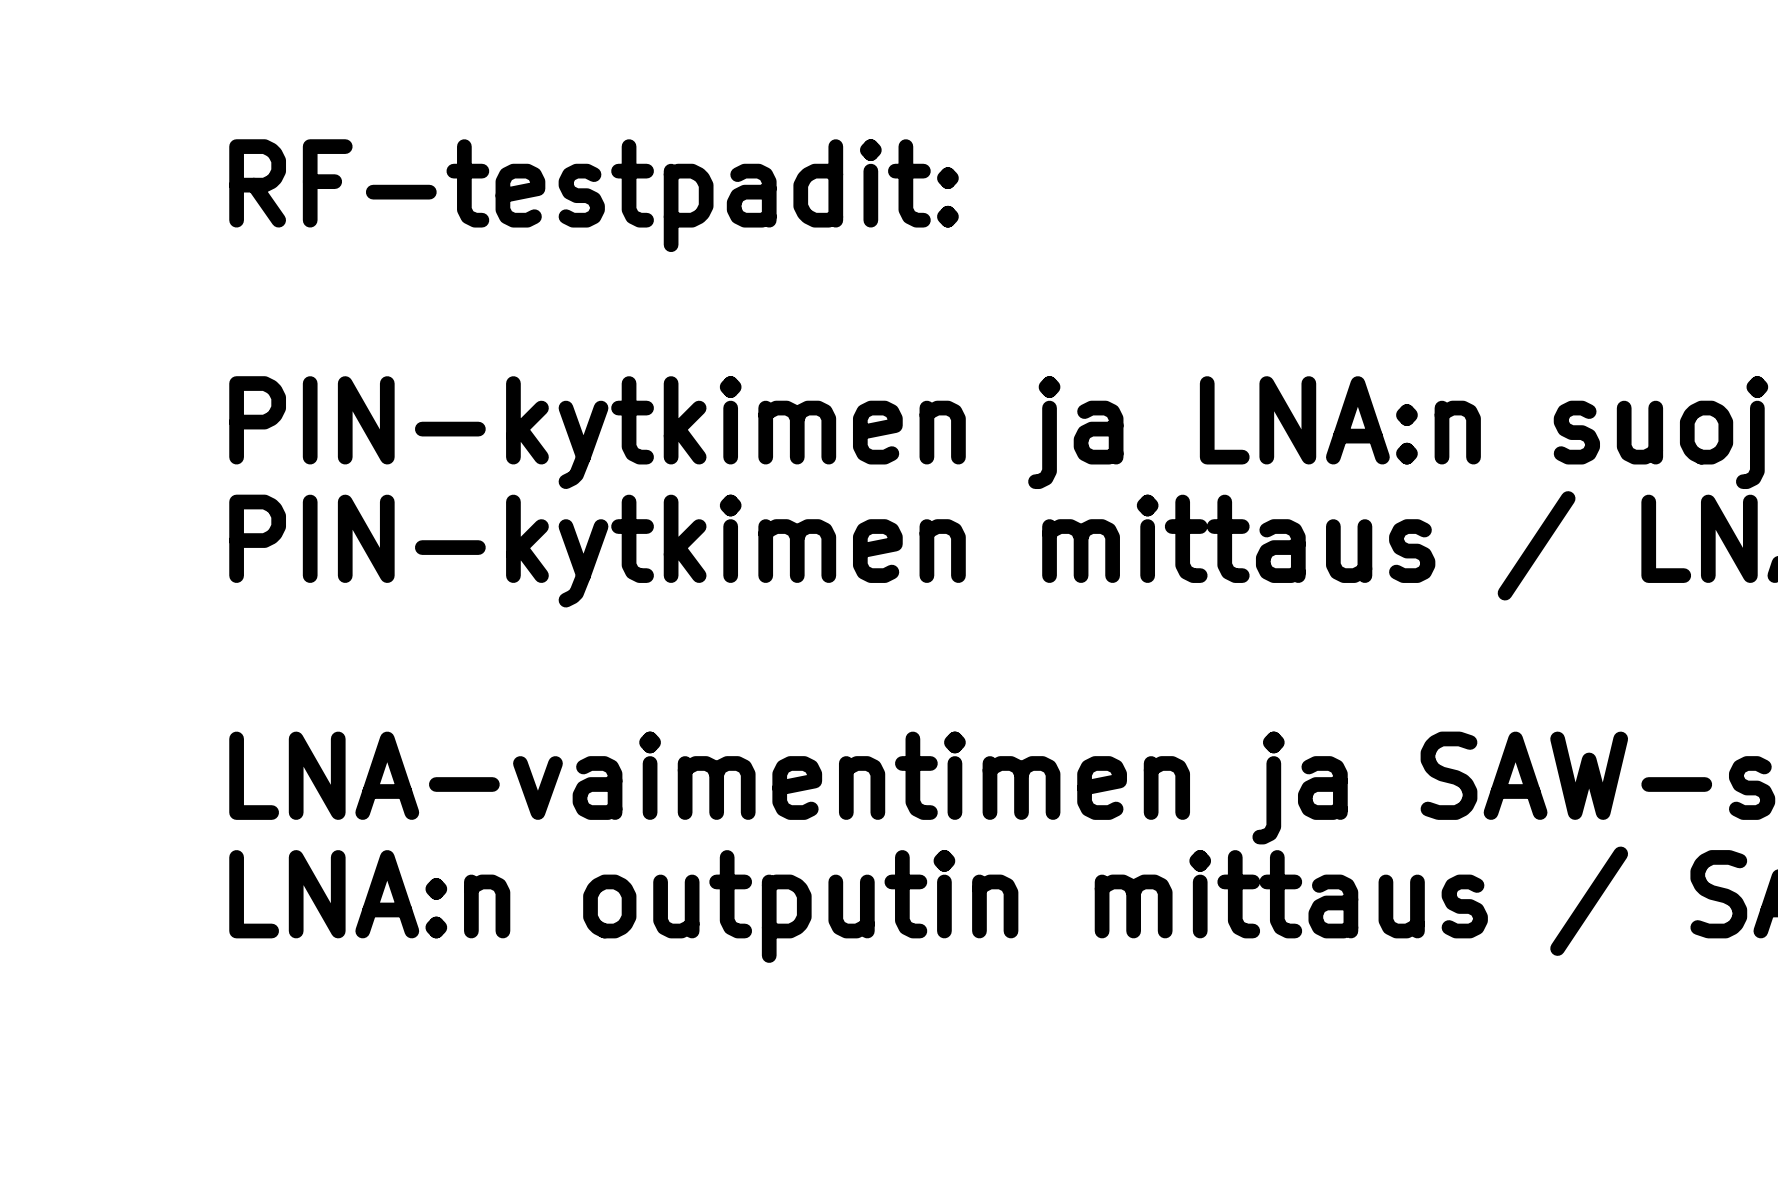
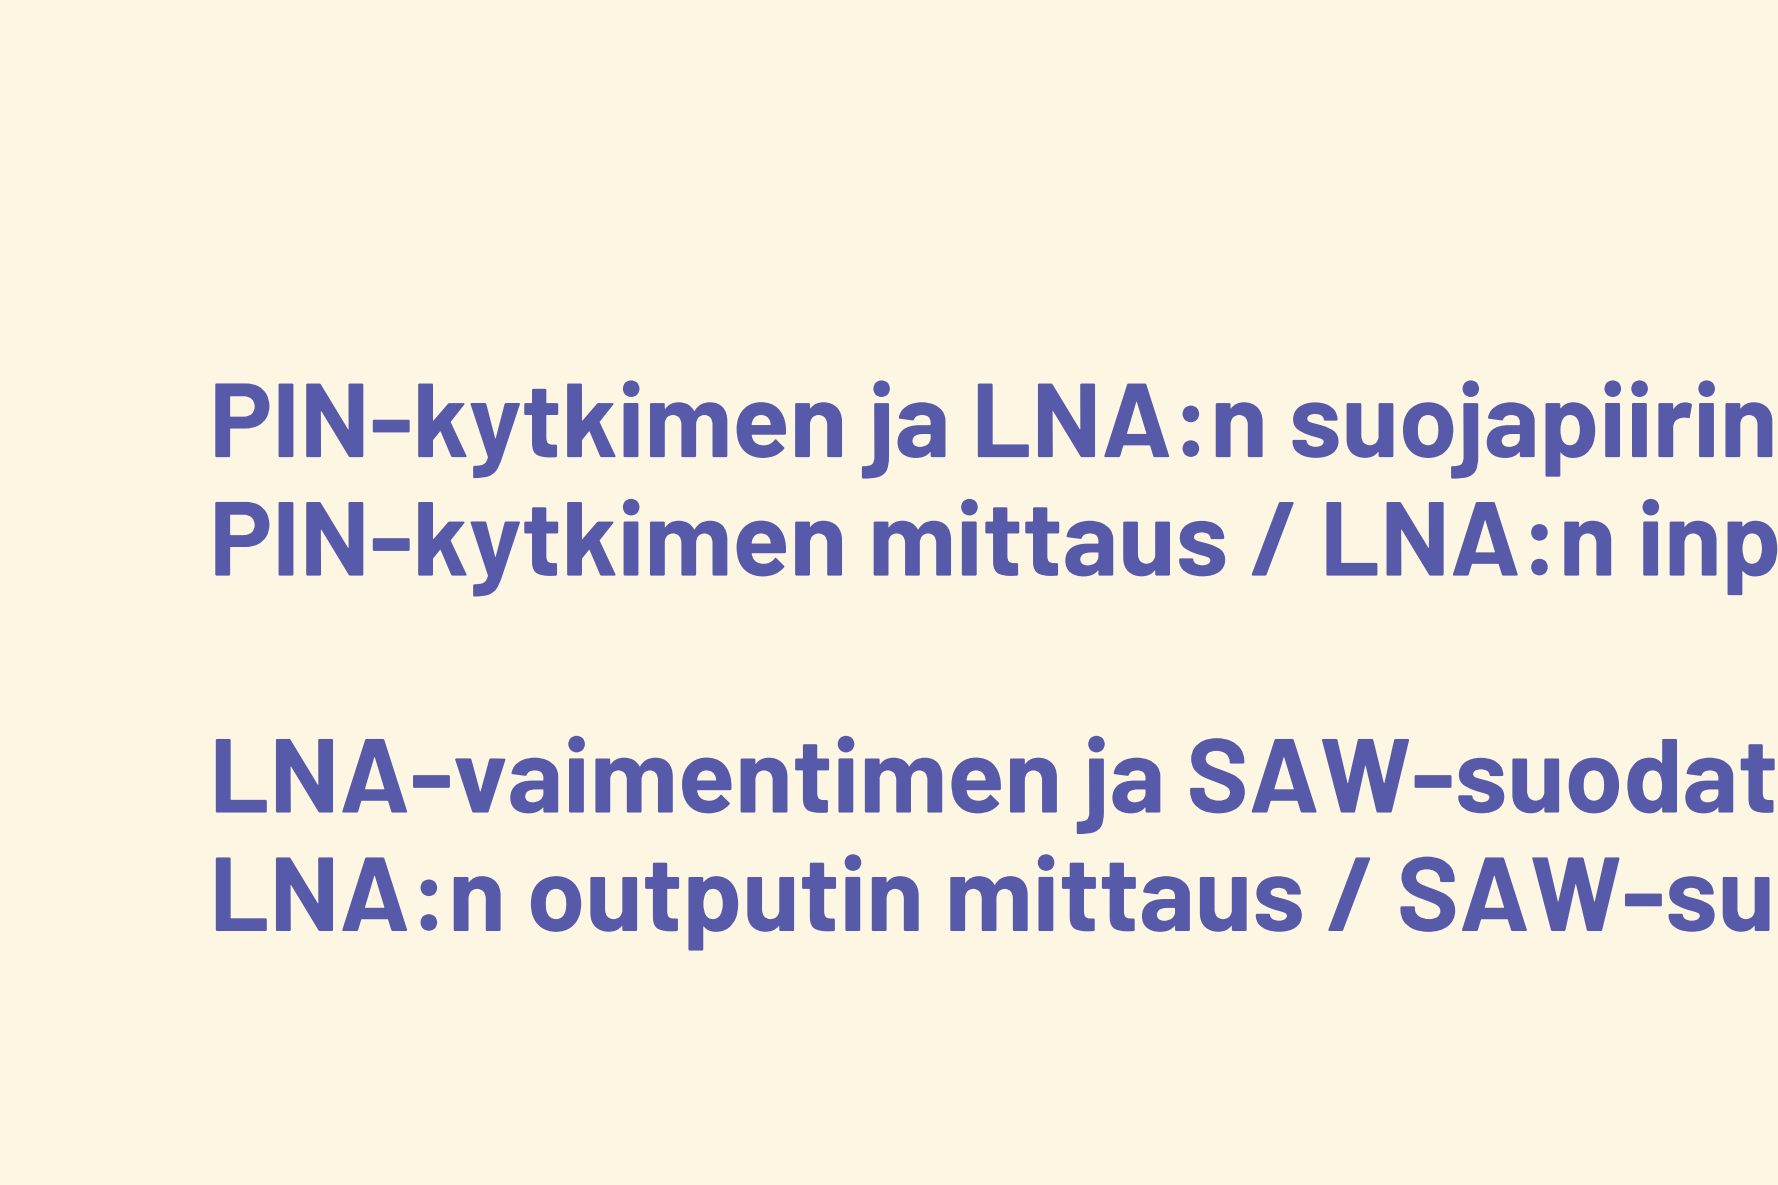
text: RF-testpadit: (594, 195) -> none

